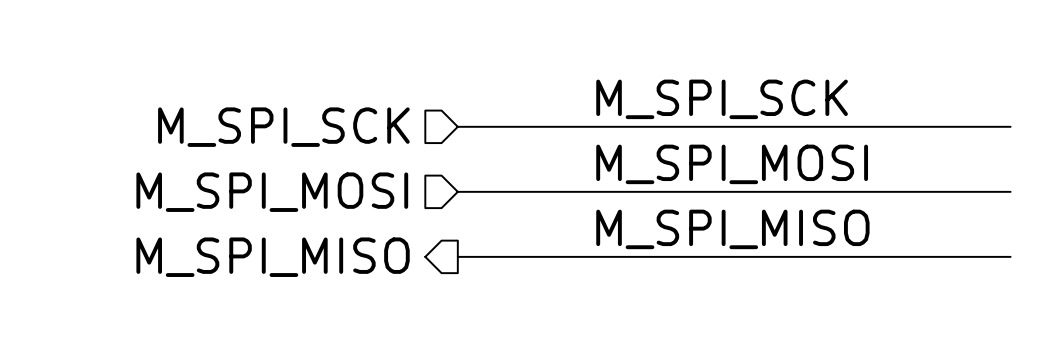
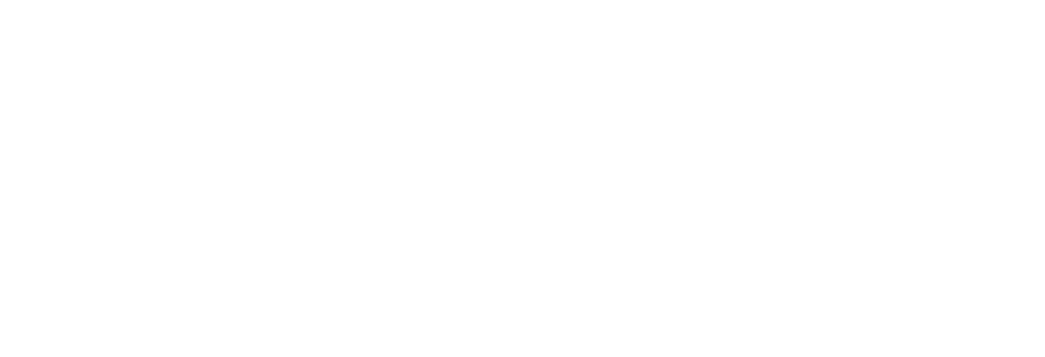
label: M_SPI_SCK (722, 99) -> none
wire: (457, 126) (1010, 126) -> none
hierarchical label: M_SPI_SCK (283, 127) -> none
label: M_SPI_MOSI (732, 164) -> none
wire: (457, 191) (1010, 191) -> none
hierarchical label: M_SPI_MOSI (272, 192) -> none
label: M_SPI_MISO (732, 229) -> none
wire: (457, 256) (1010, 256) -> none
hierarchical label: M_SPI_MISO (273, 257) -> none

